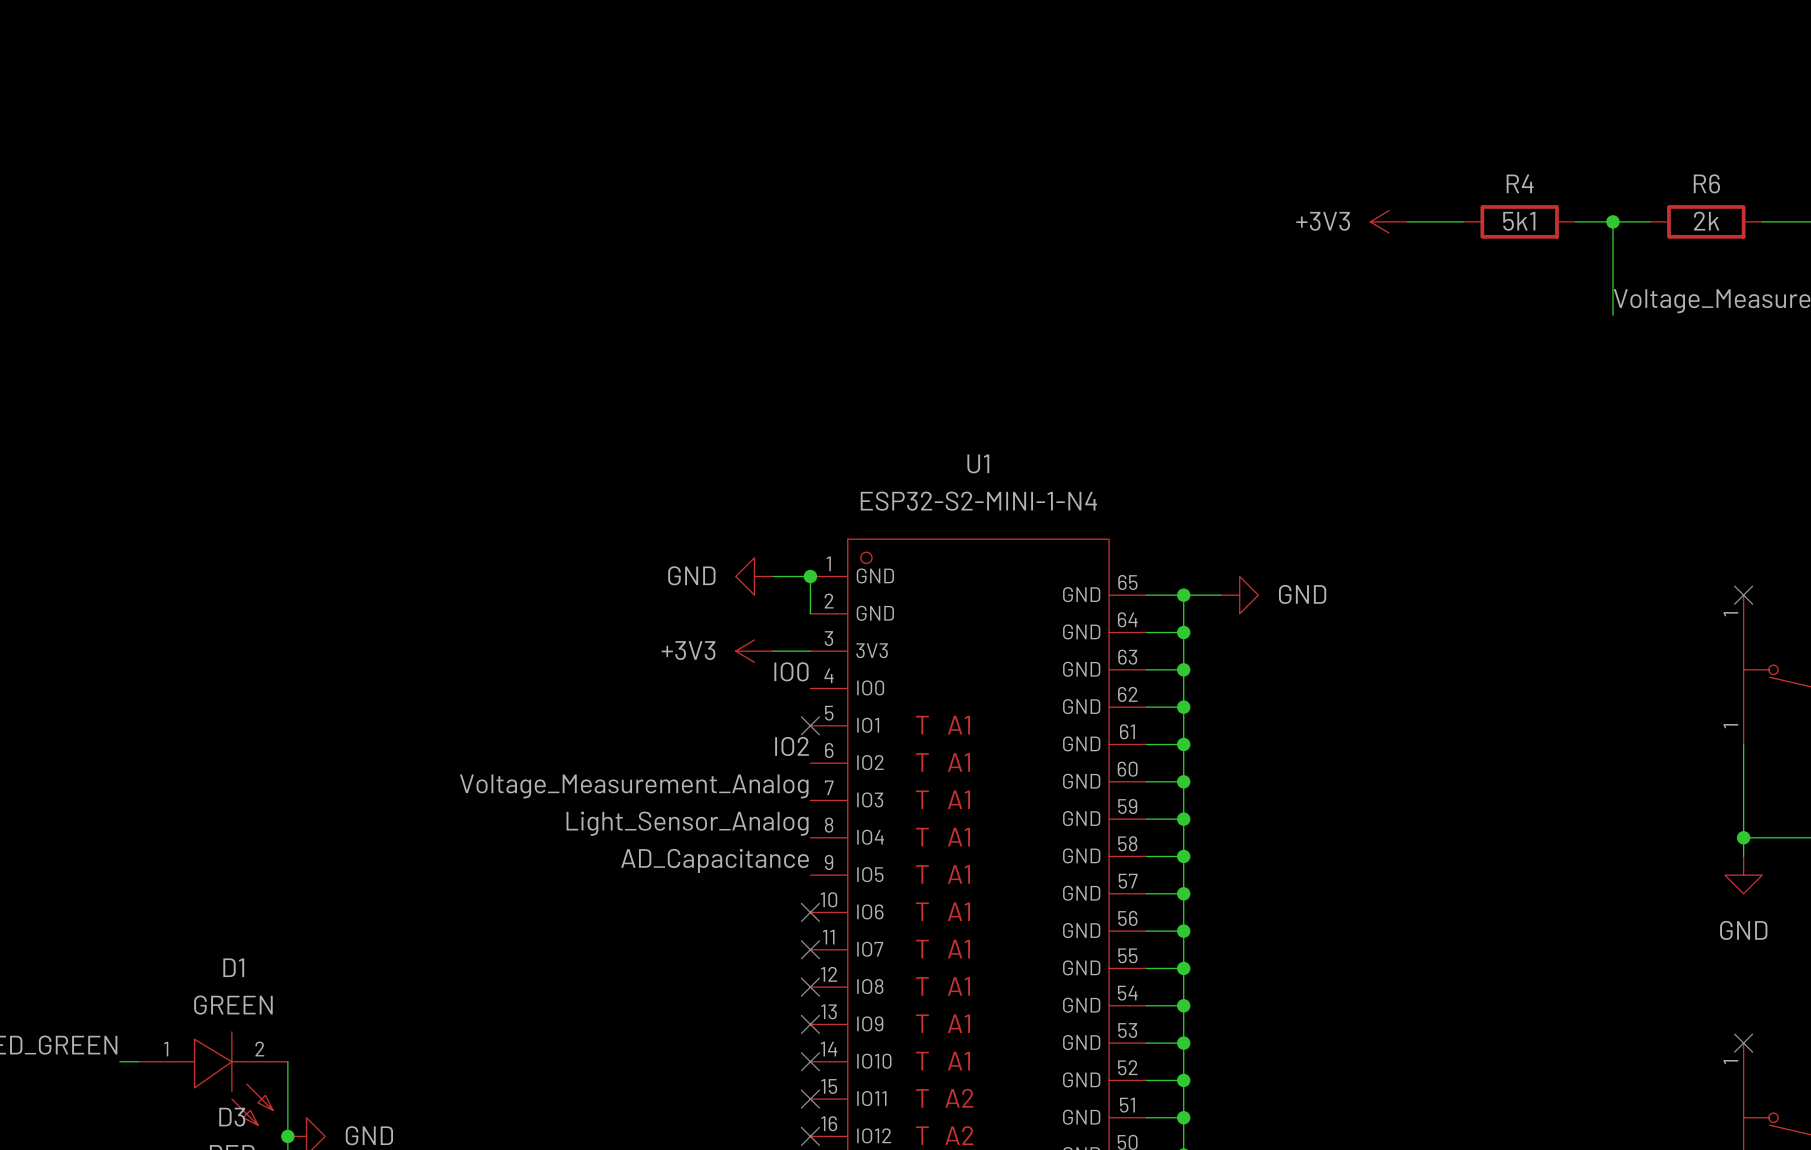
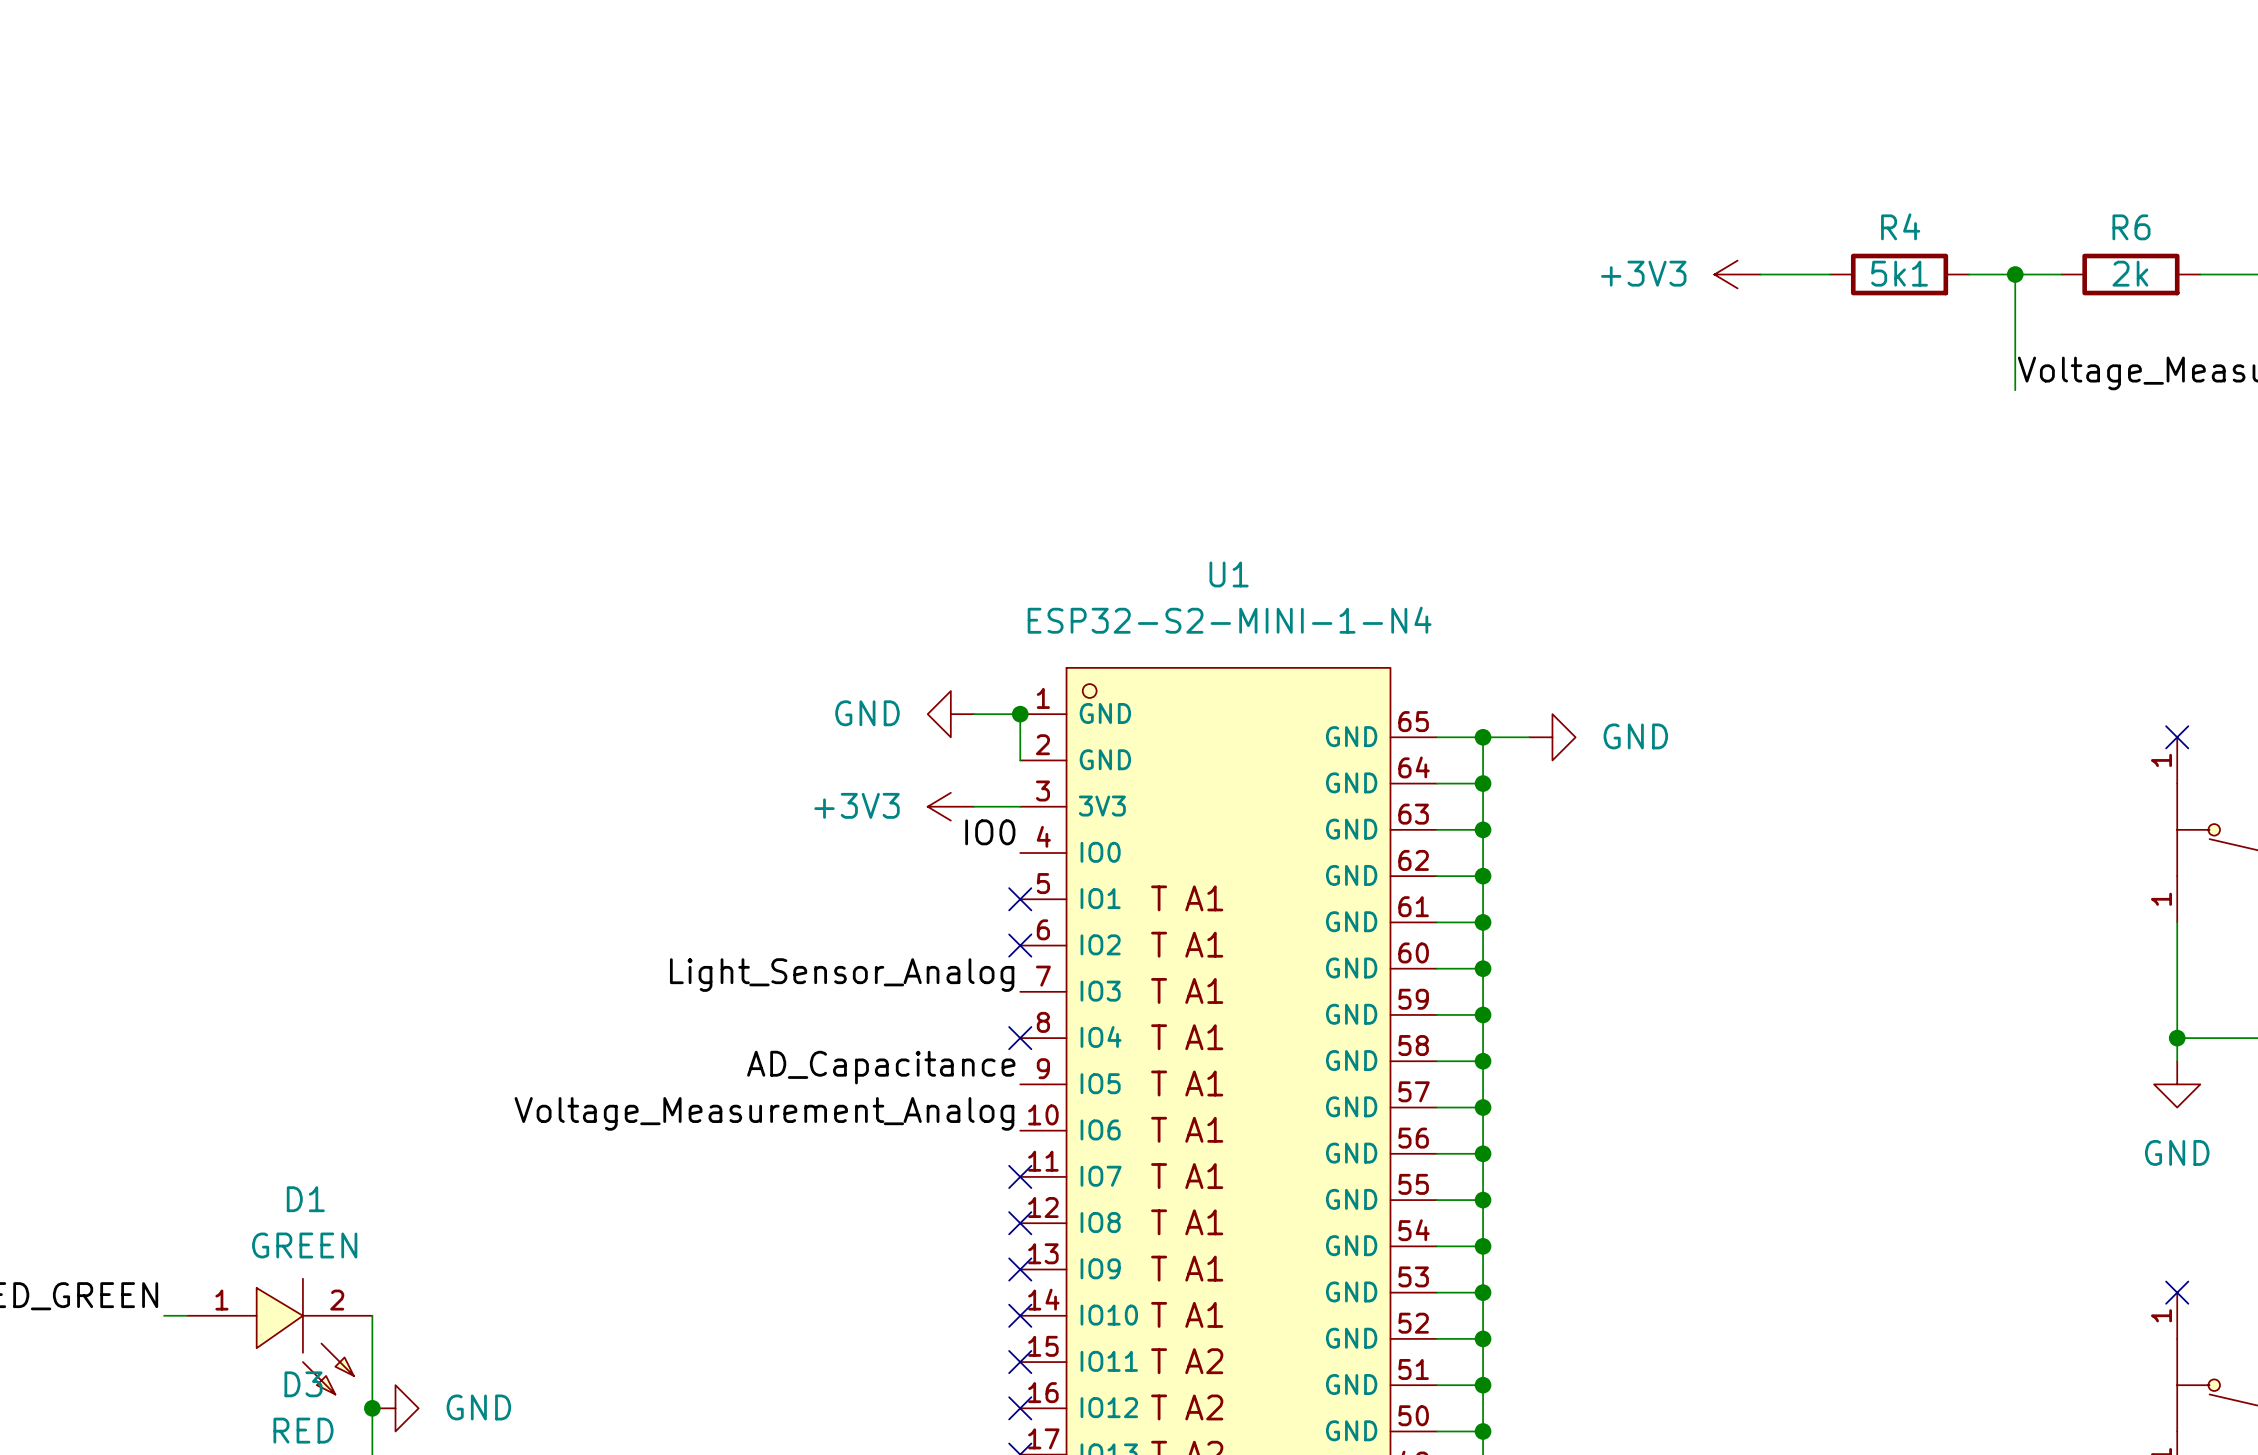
label: IO2 (792, 746) -> none
no-connect mark: none -> (1020, 945)
label: Voltage_Measurement_Analog (634, 786) -> Light_Sensor_Analog (842, 975)
label: Light_Sensor_Analog (687, 823) -> none
no-connect mark: none -> (1020, 1038)
label: none -> Voltage_Measurement_Analog (764, 1113)
no-connect mark: (810, 912) -> none

